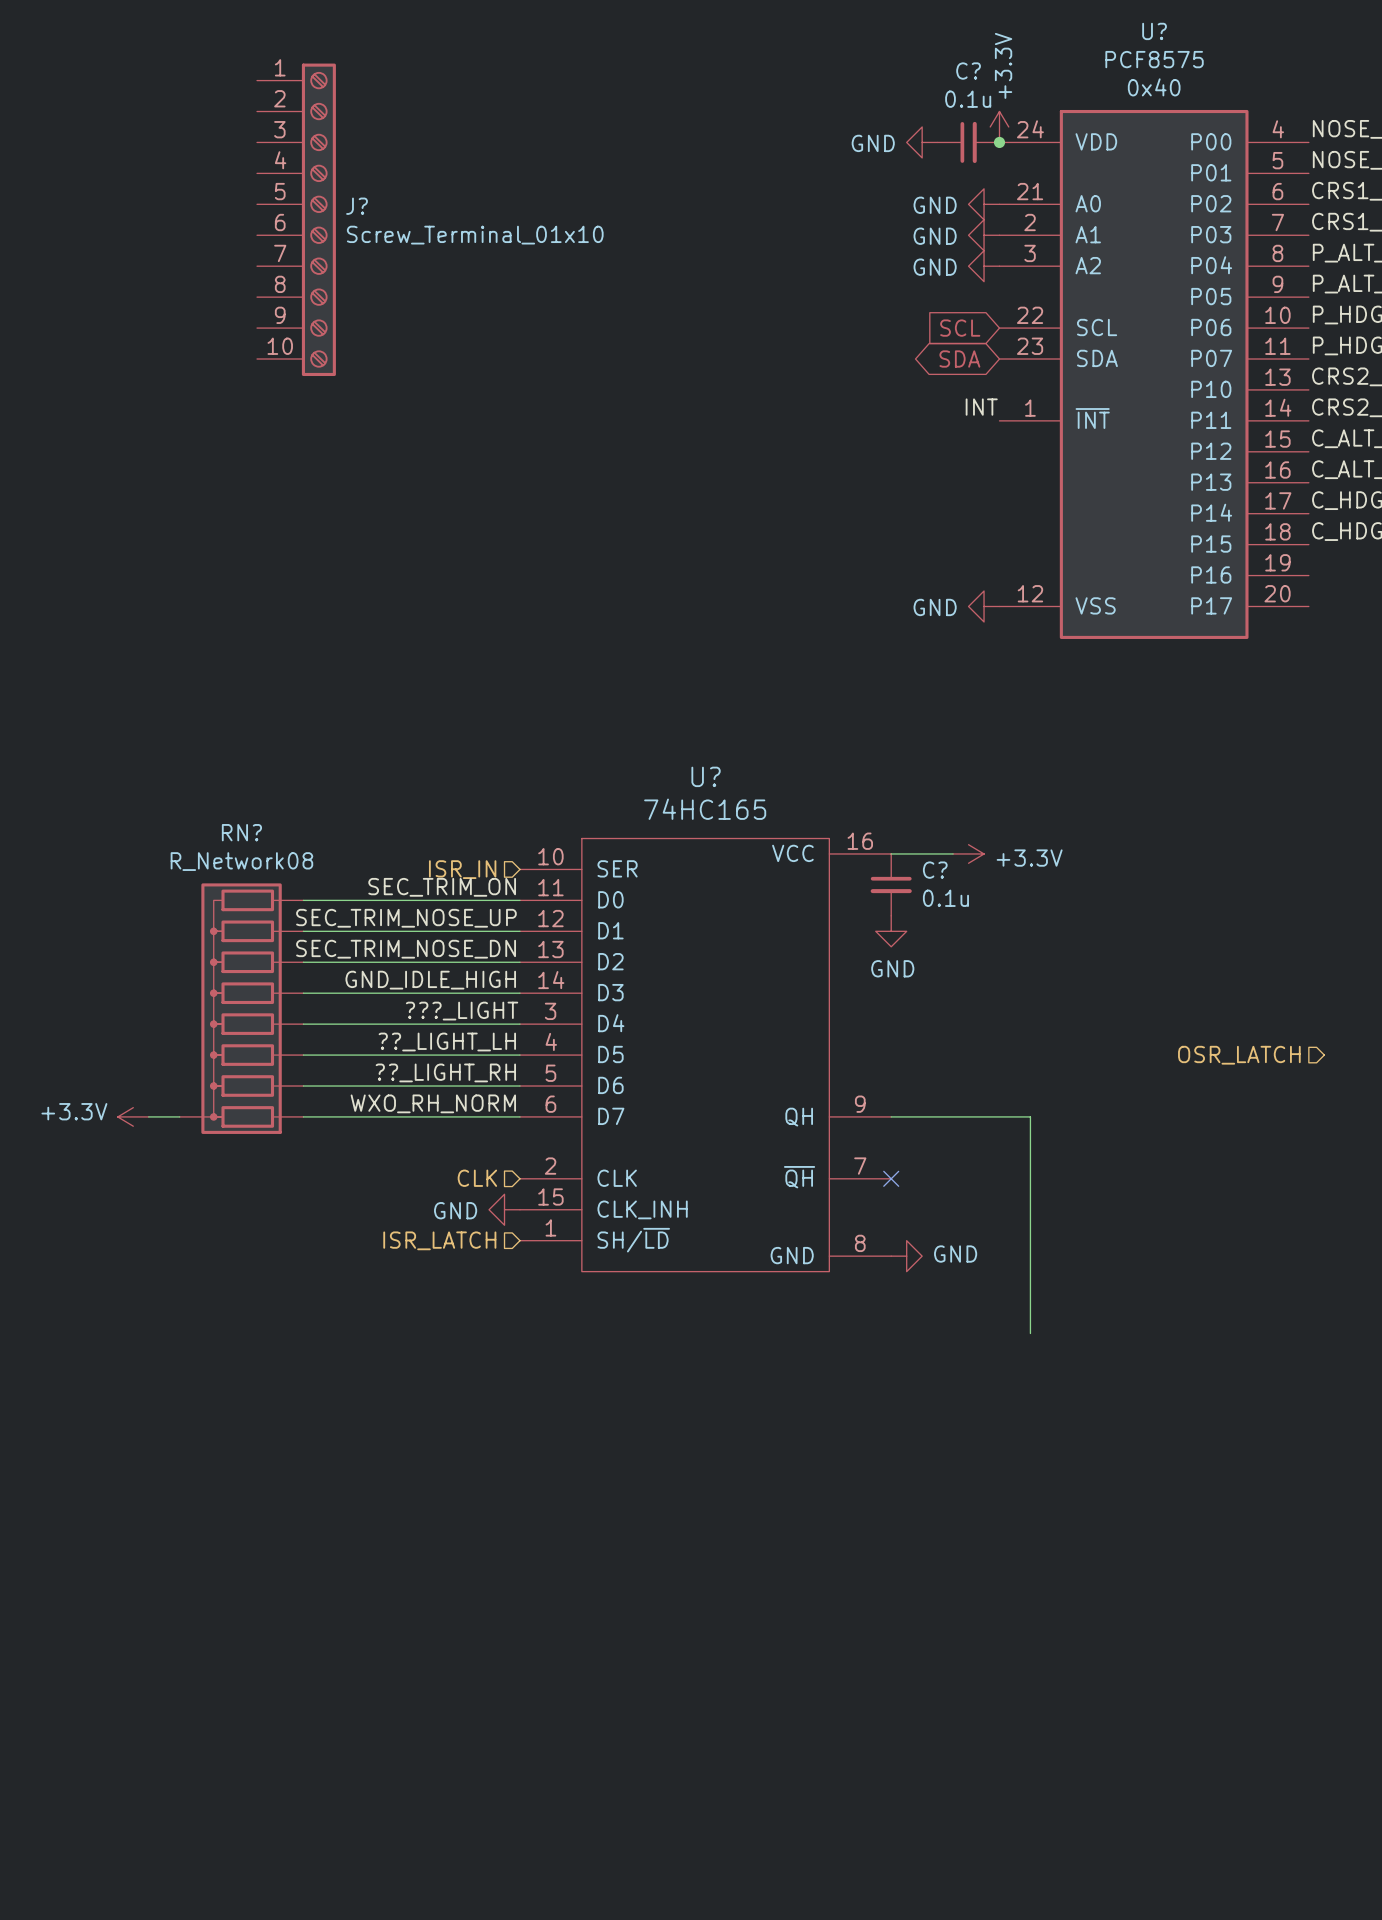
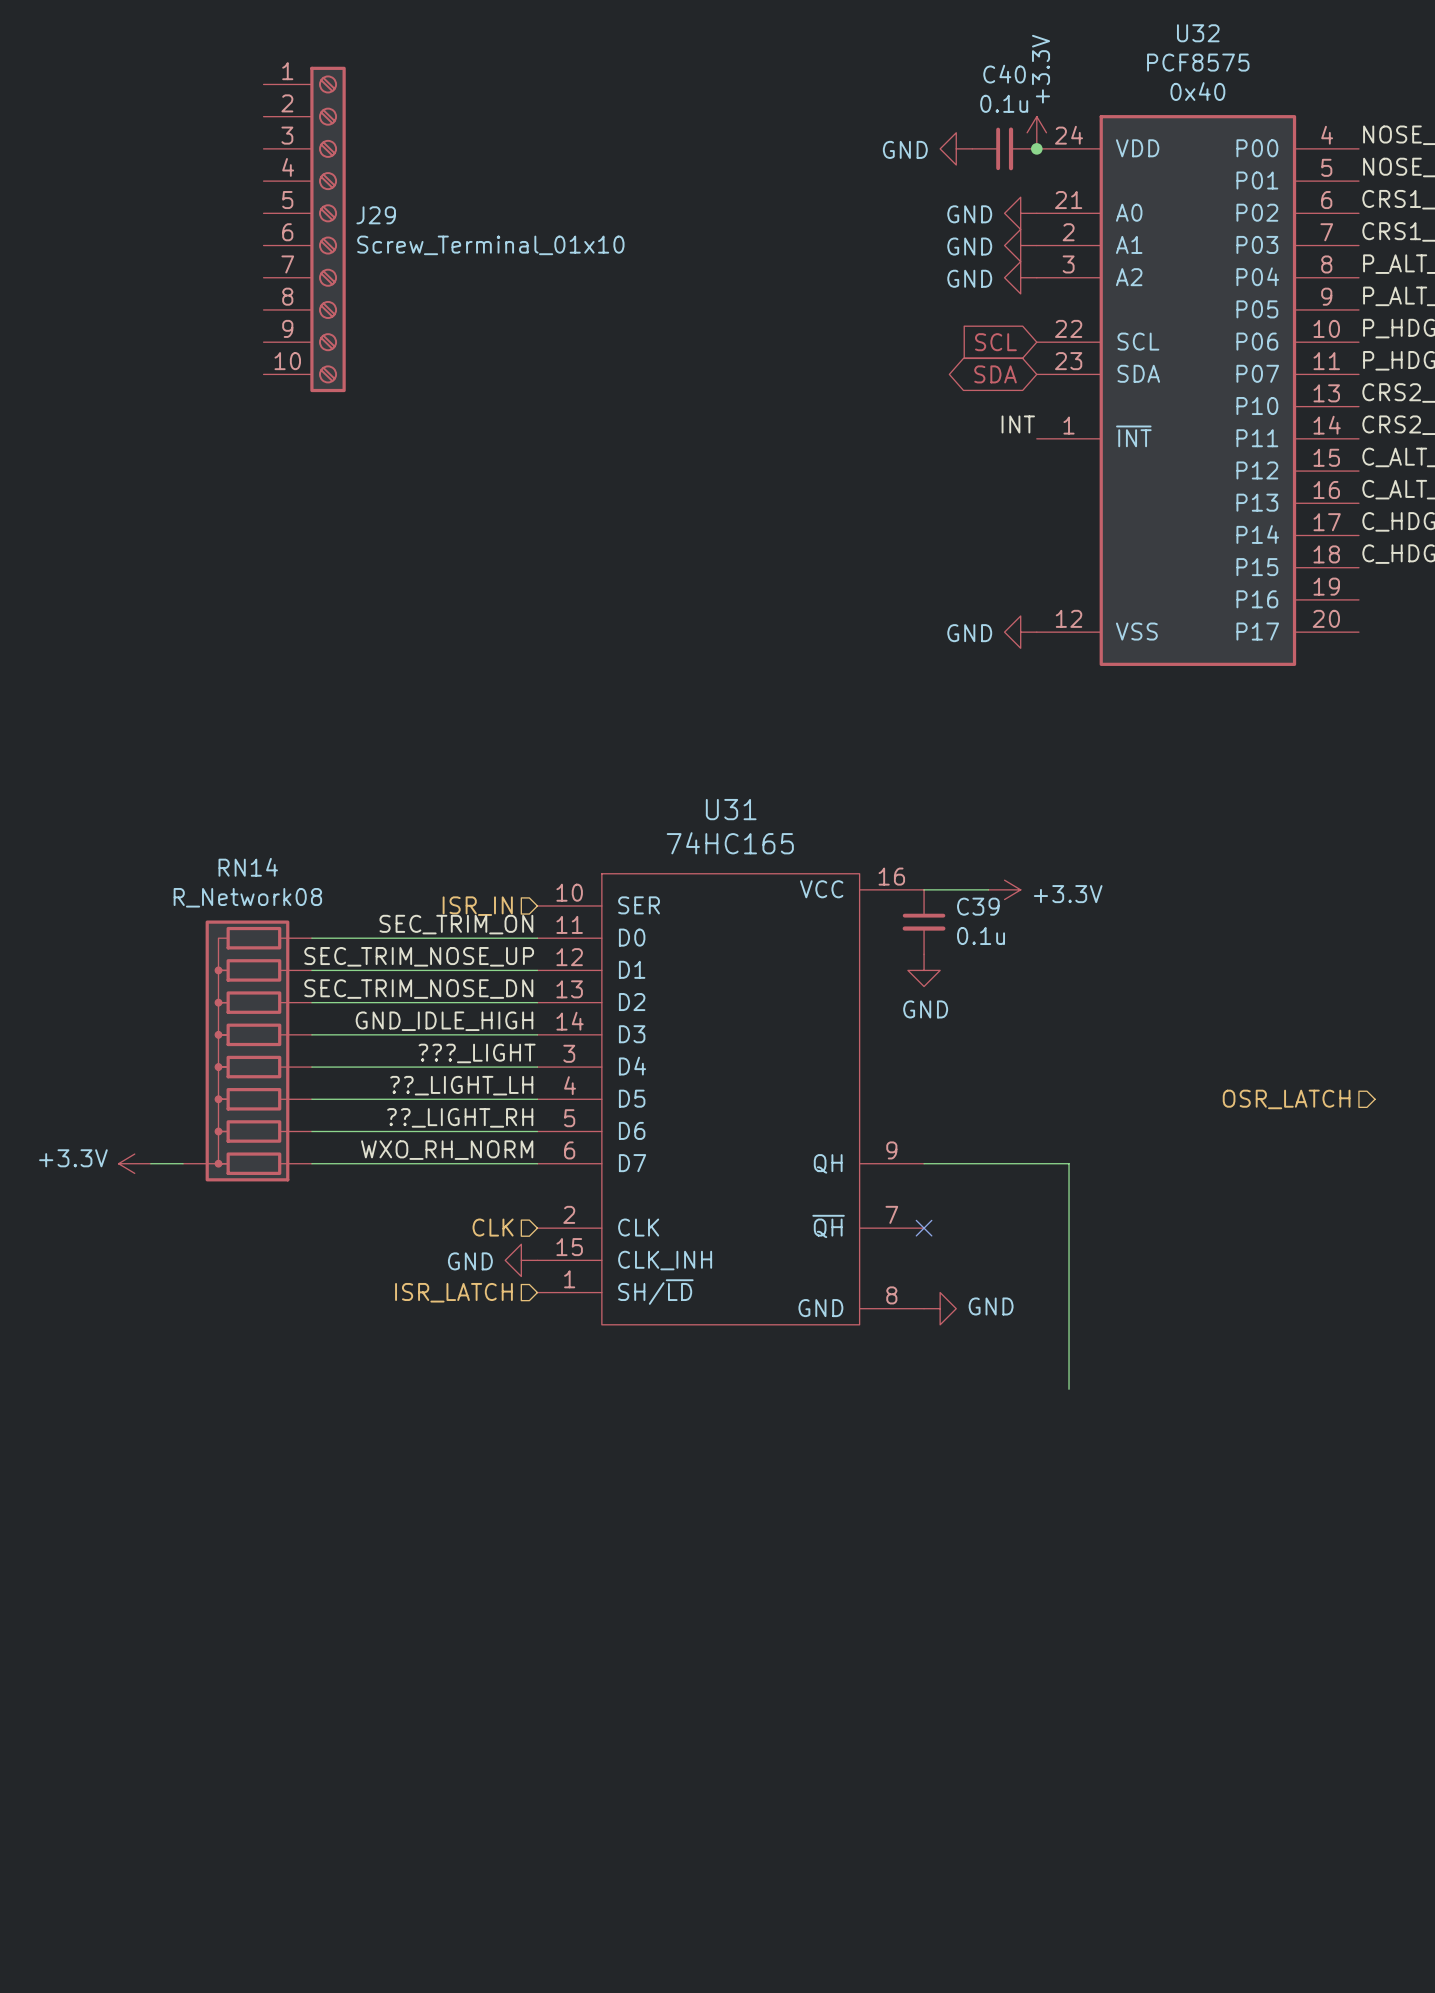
U? name: U? (1154, 31) -> U32 (1198, 33)
C? name: C? (968, 71) -> C40 (1004, 74)
J? name: J? (357, 206) -> J29 (376, 215)
U? name: U? (706, 776) -> U31 (731, 809)
RN? name: RN? (241, 832) -> RN14 (248, 867)
C? name: C? (935, 870) -> C39 (978, 906)

